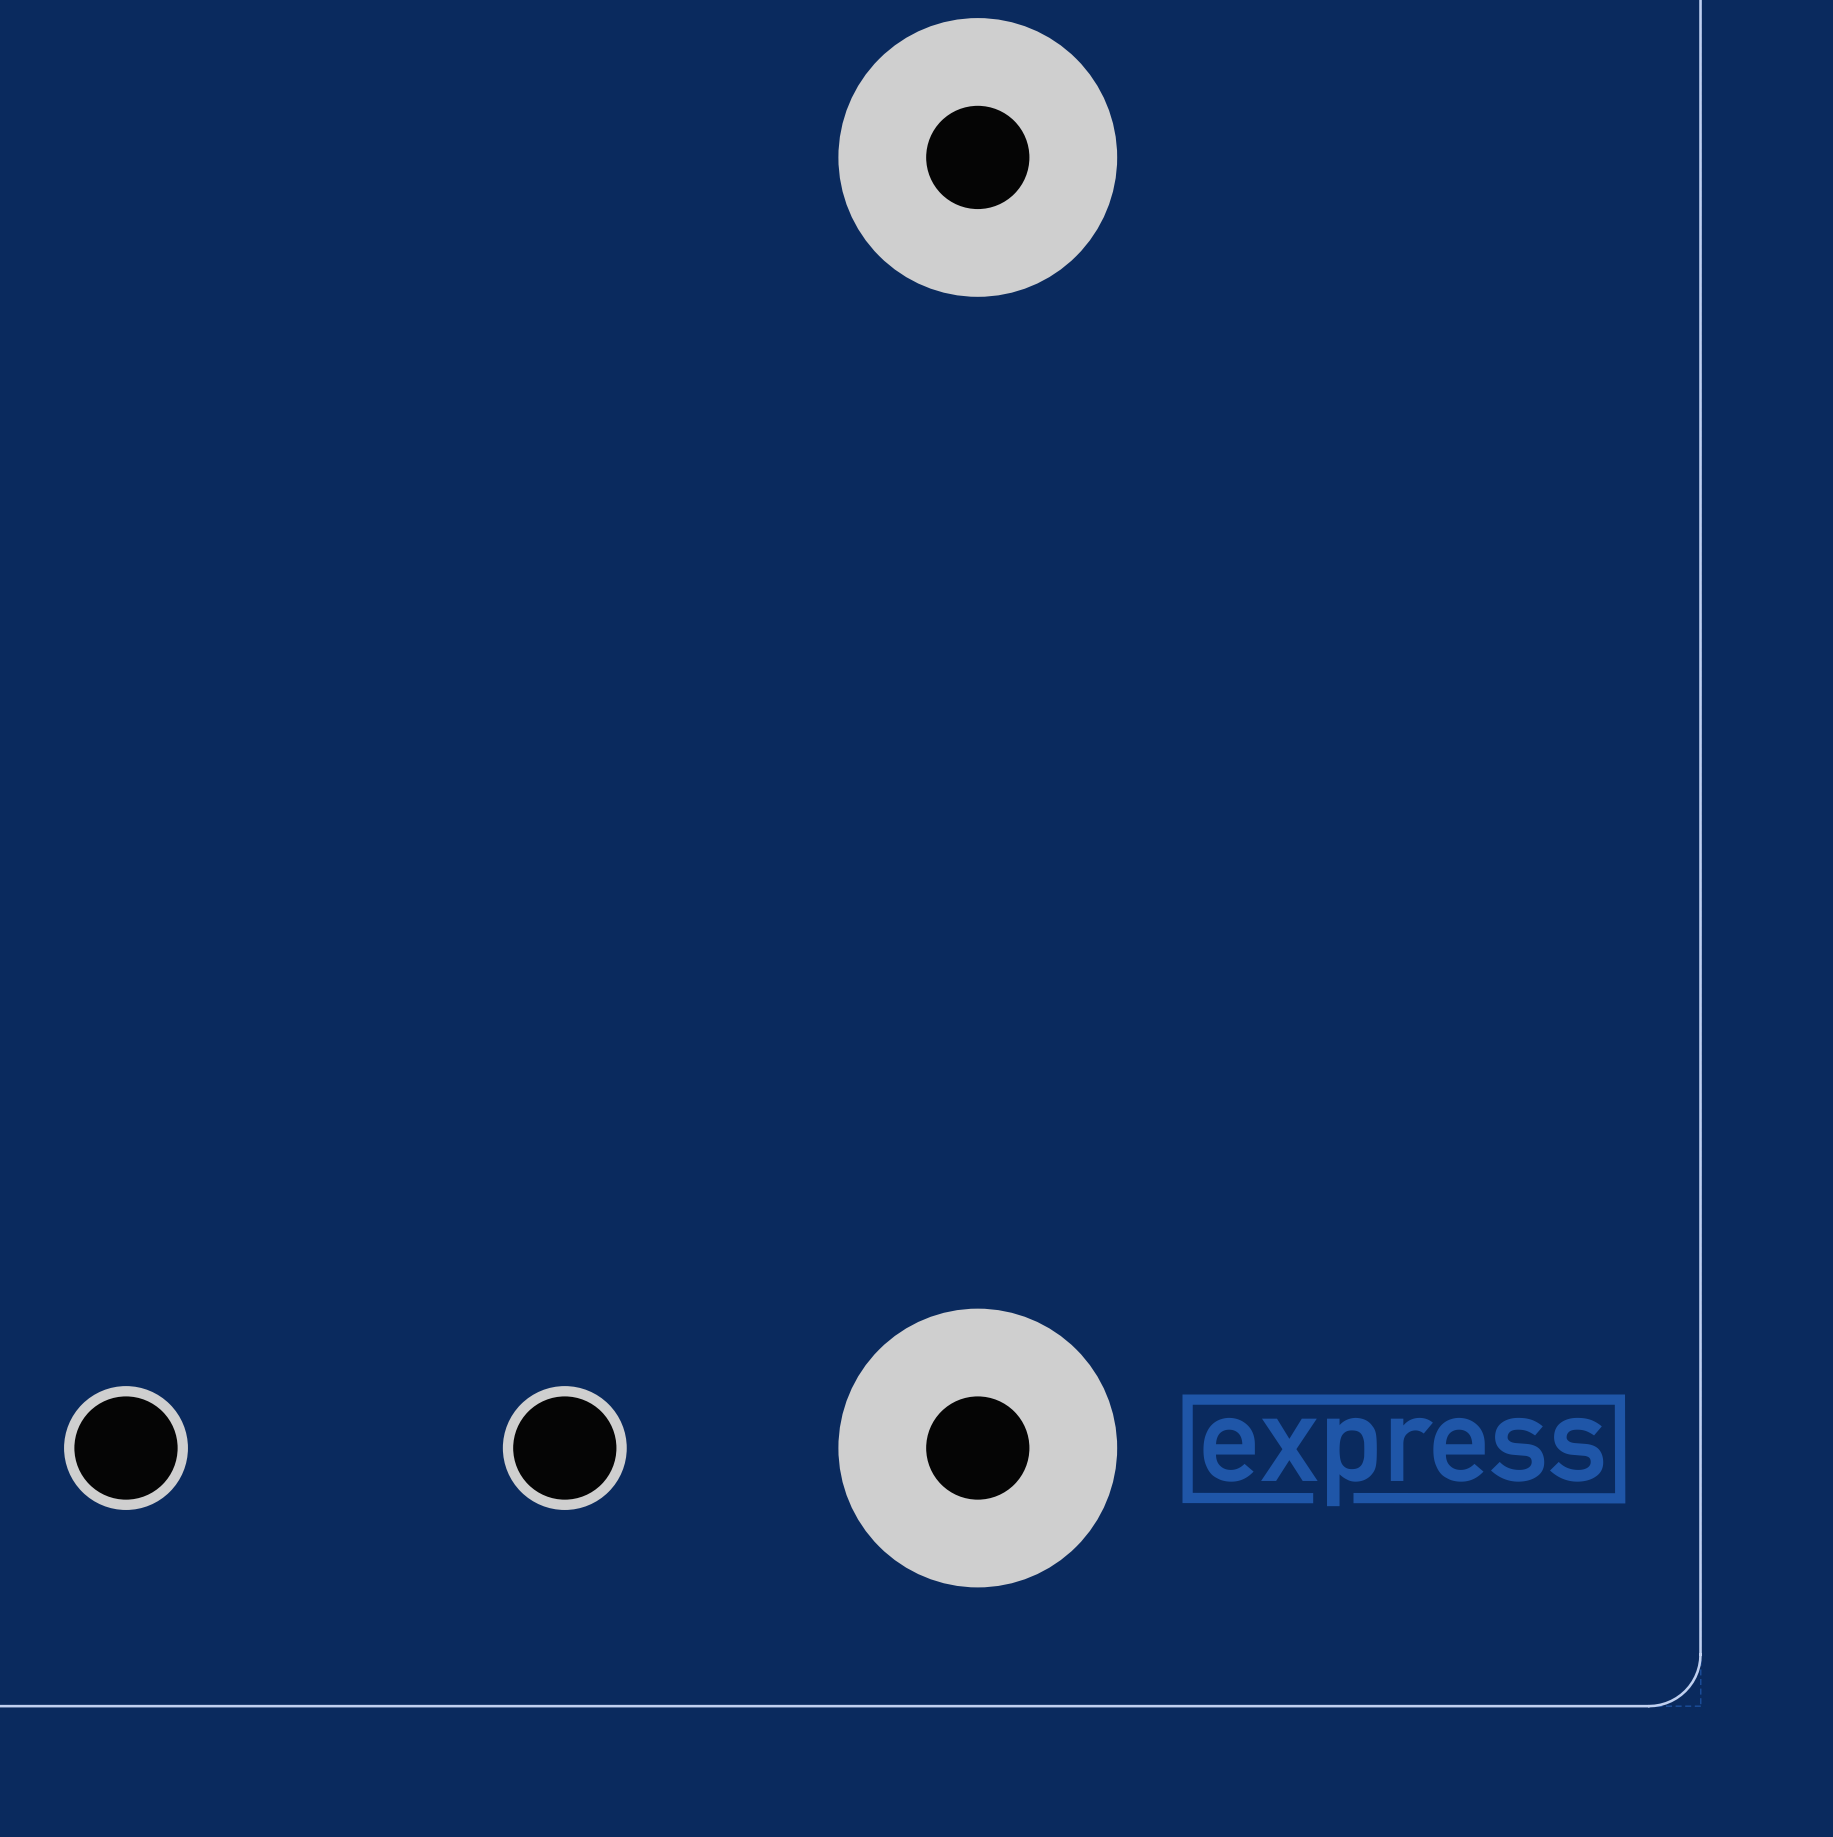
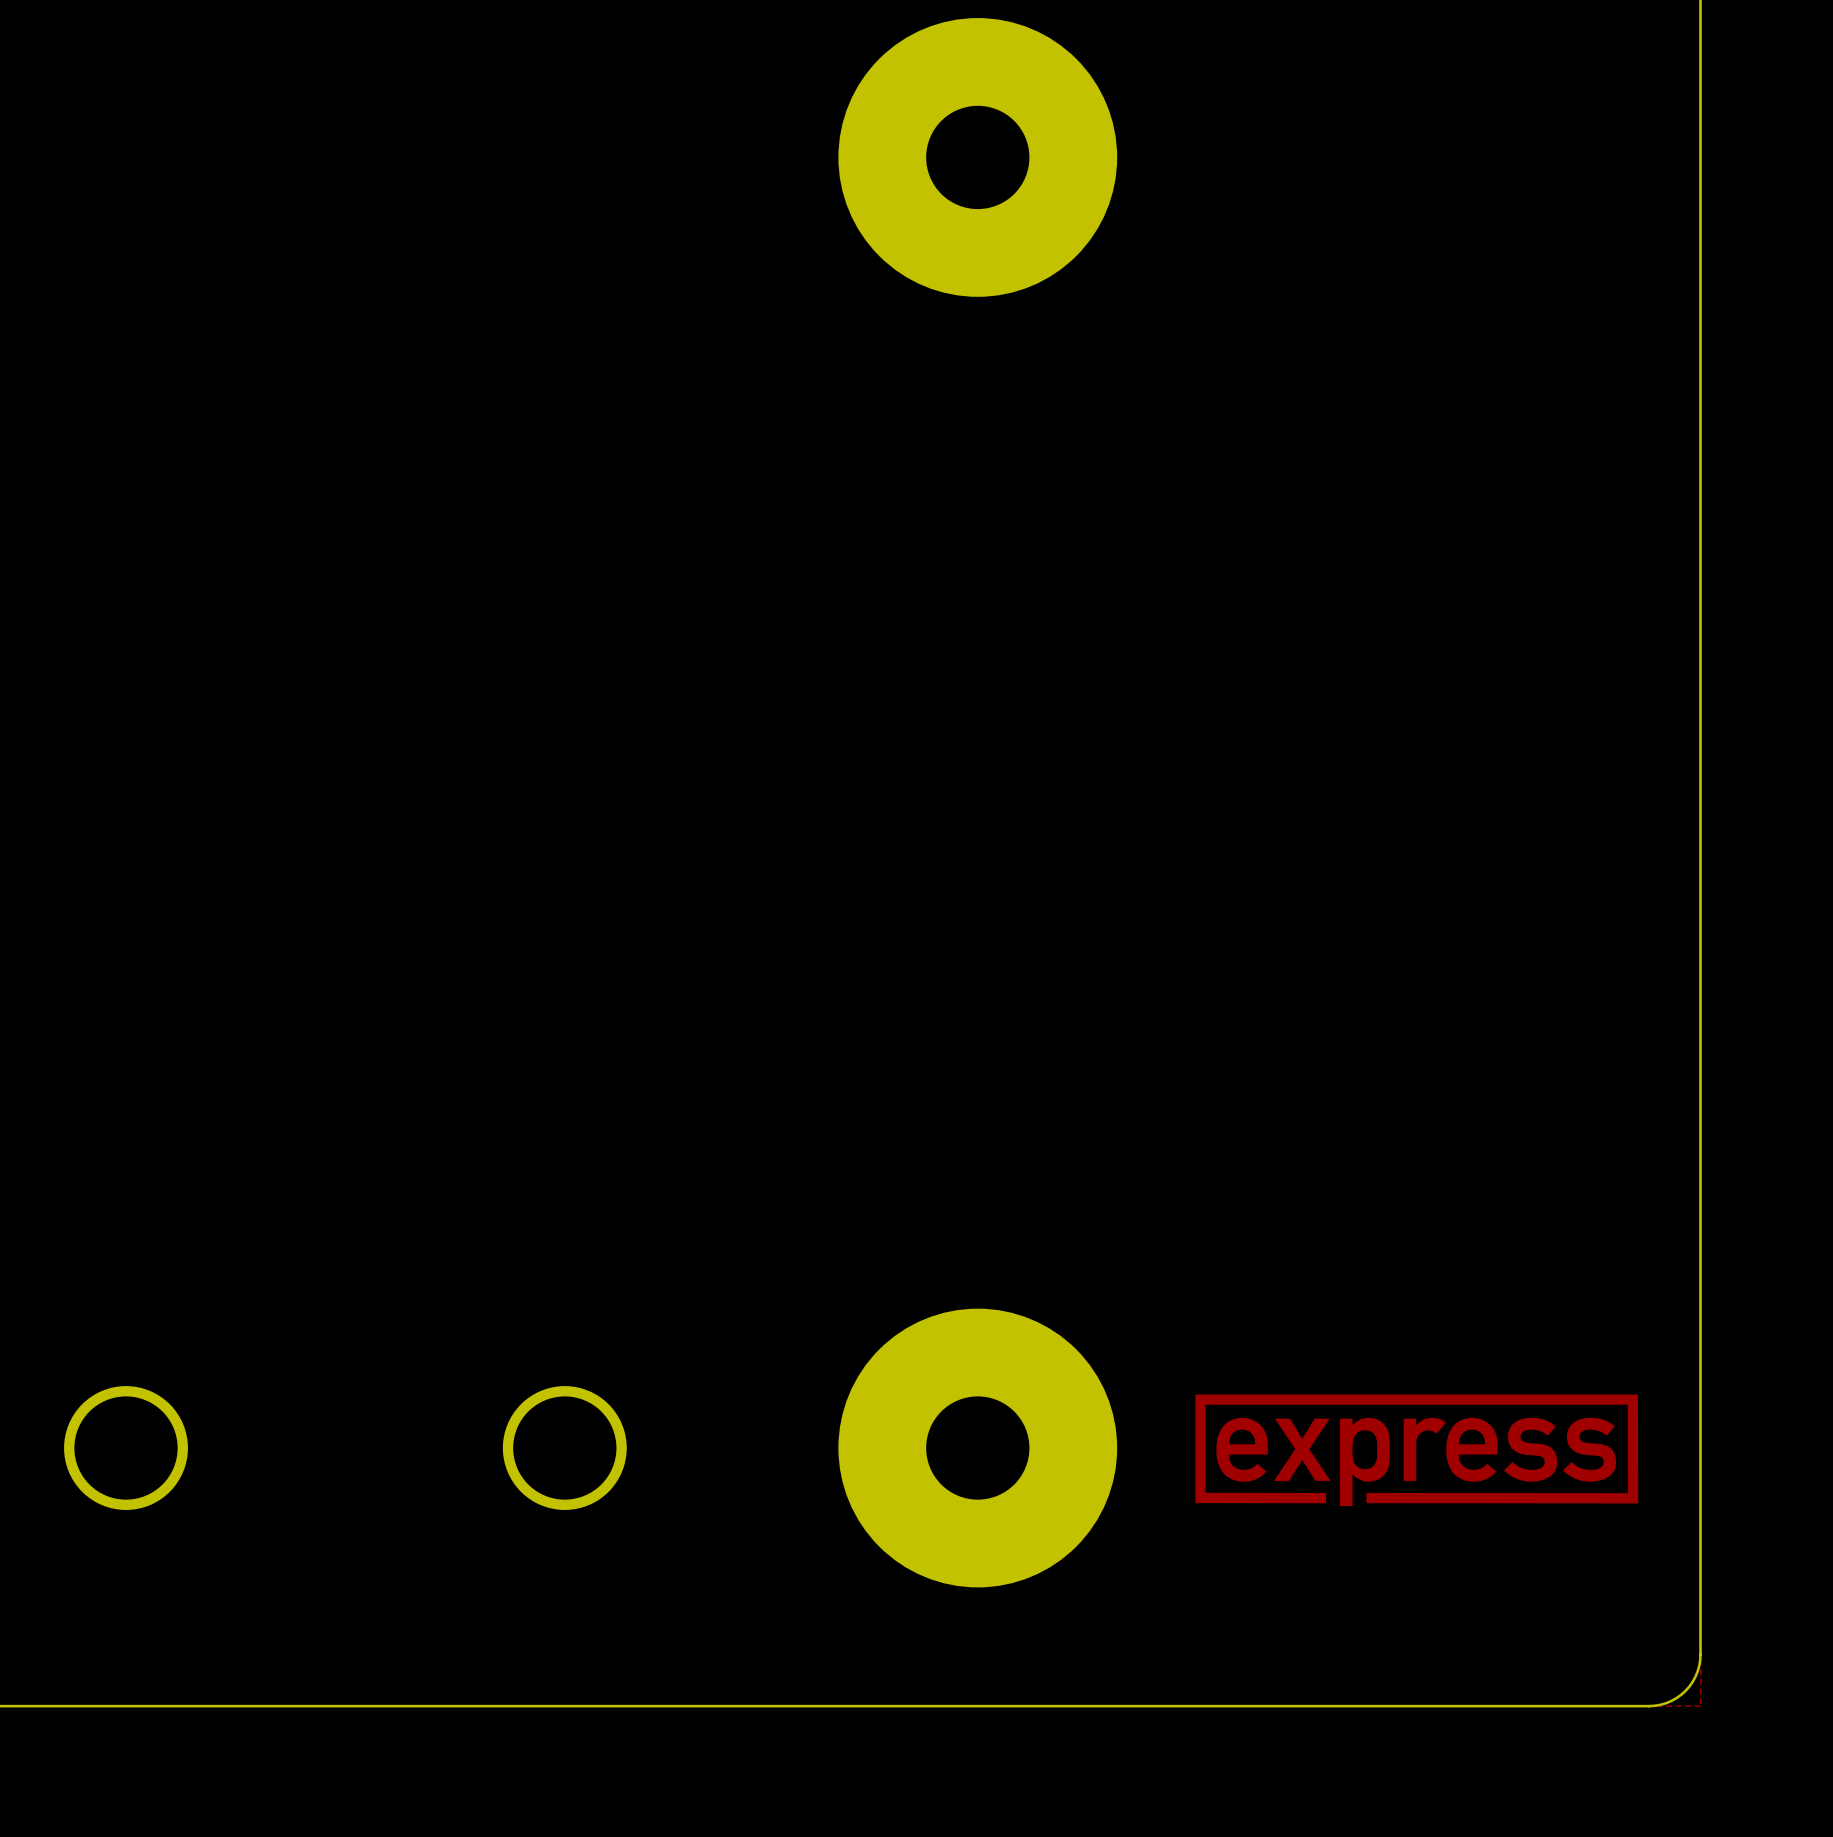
drawing position: (1403, 1450) -> (1416, 1450)

